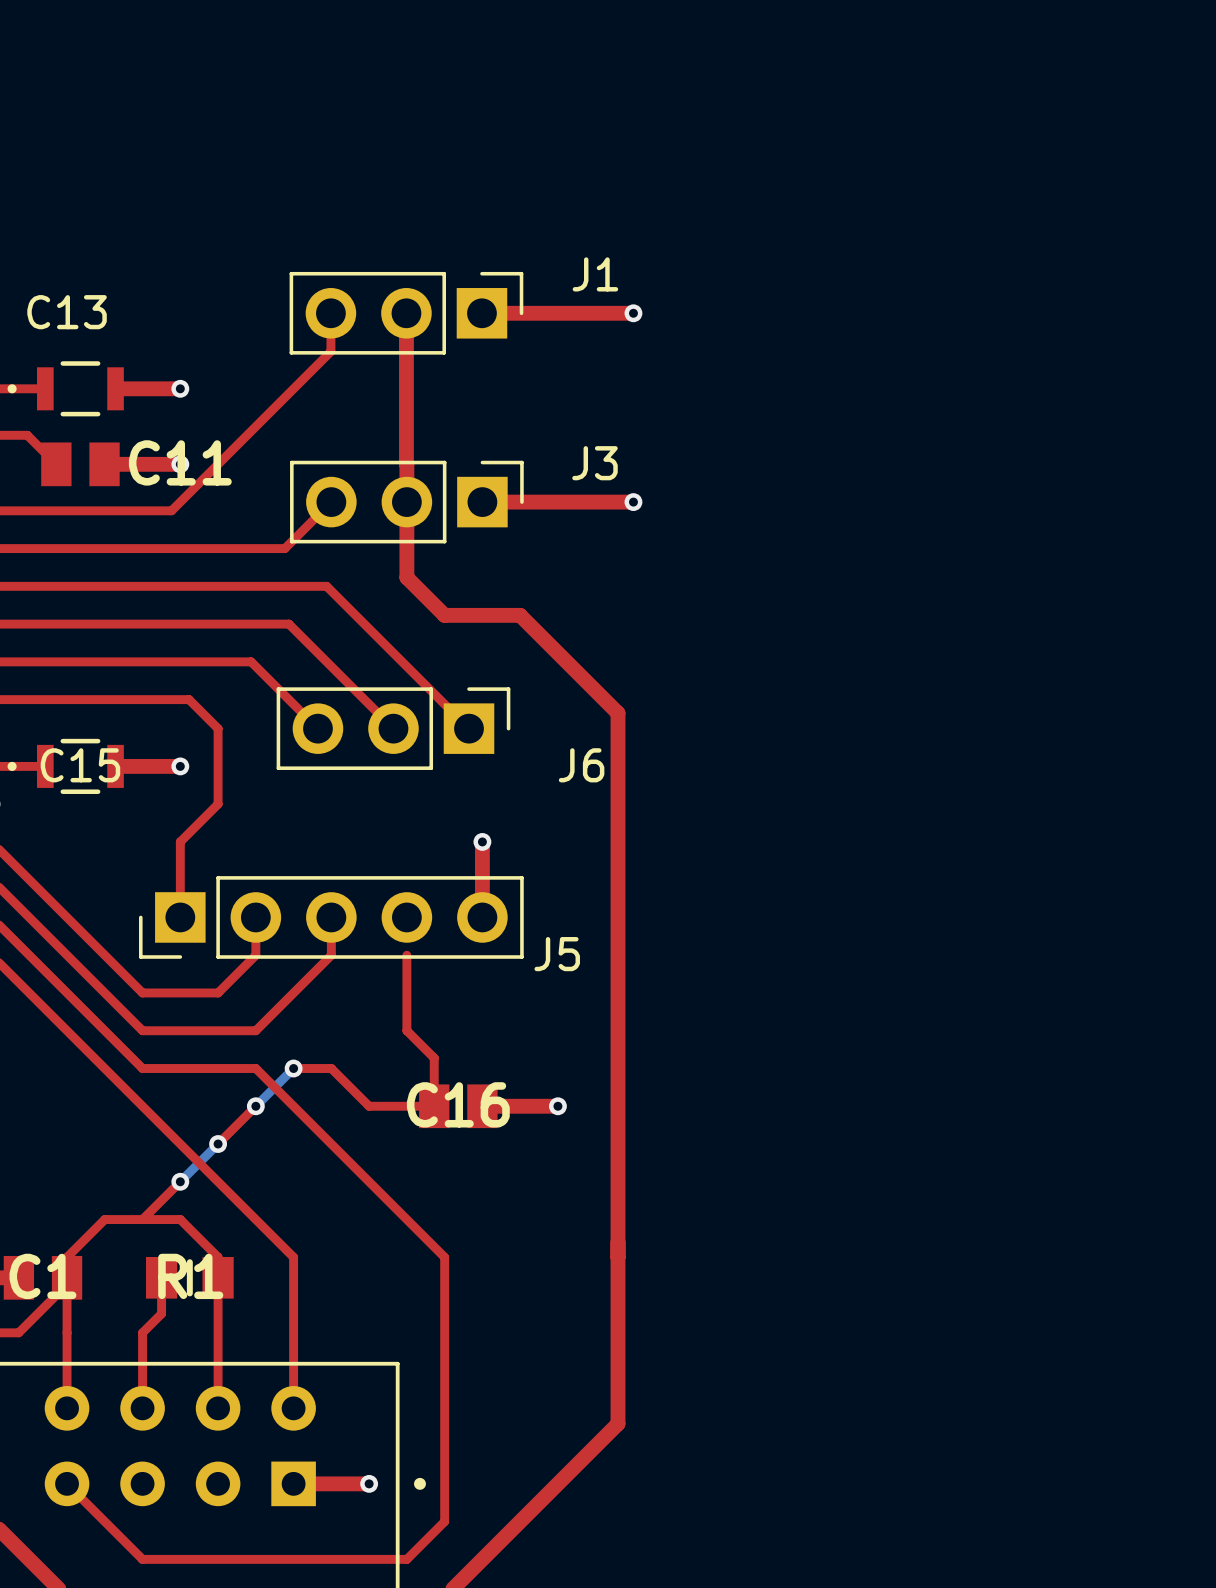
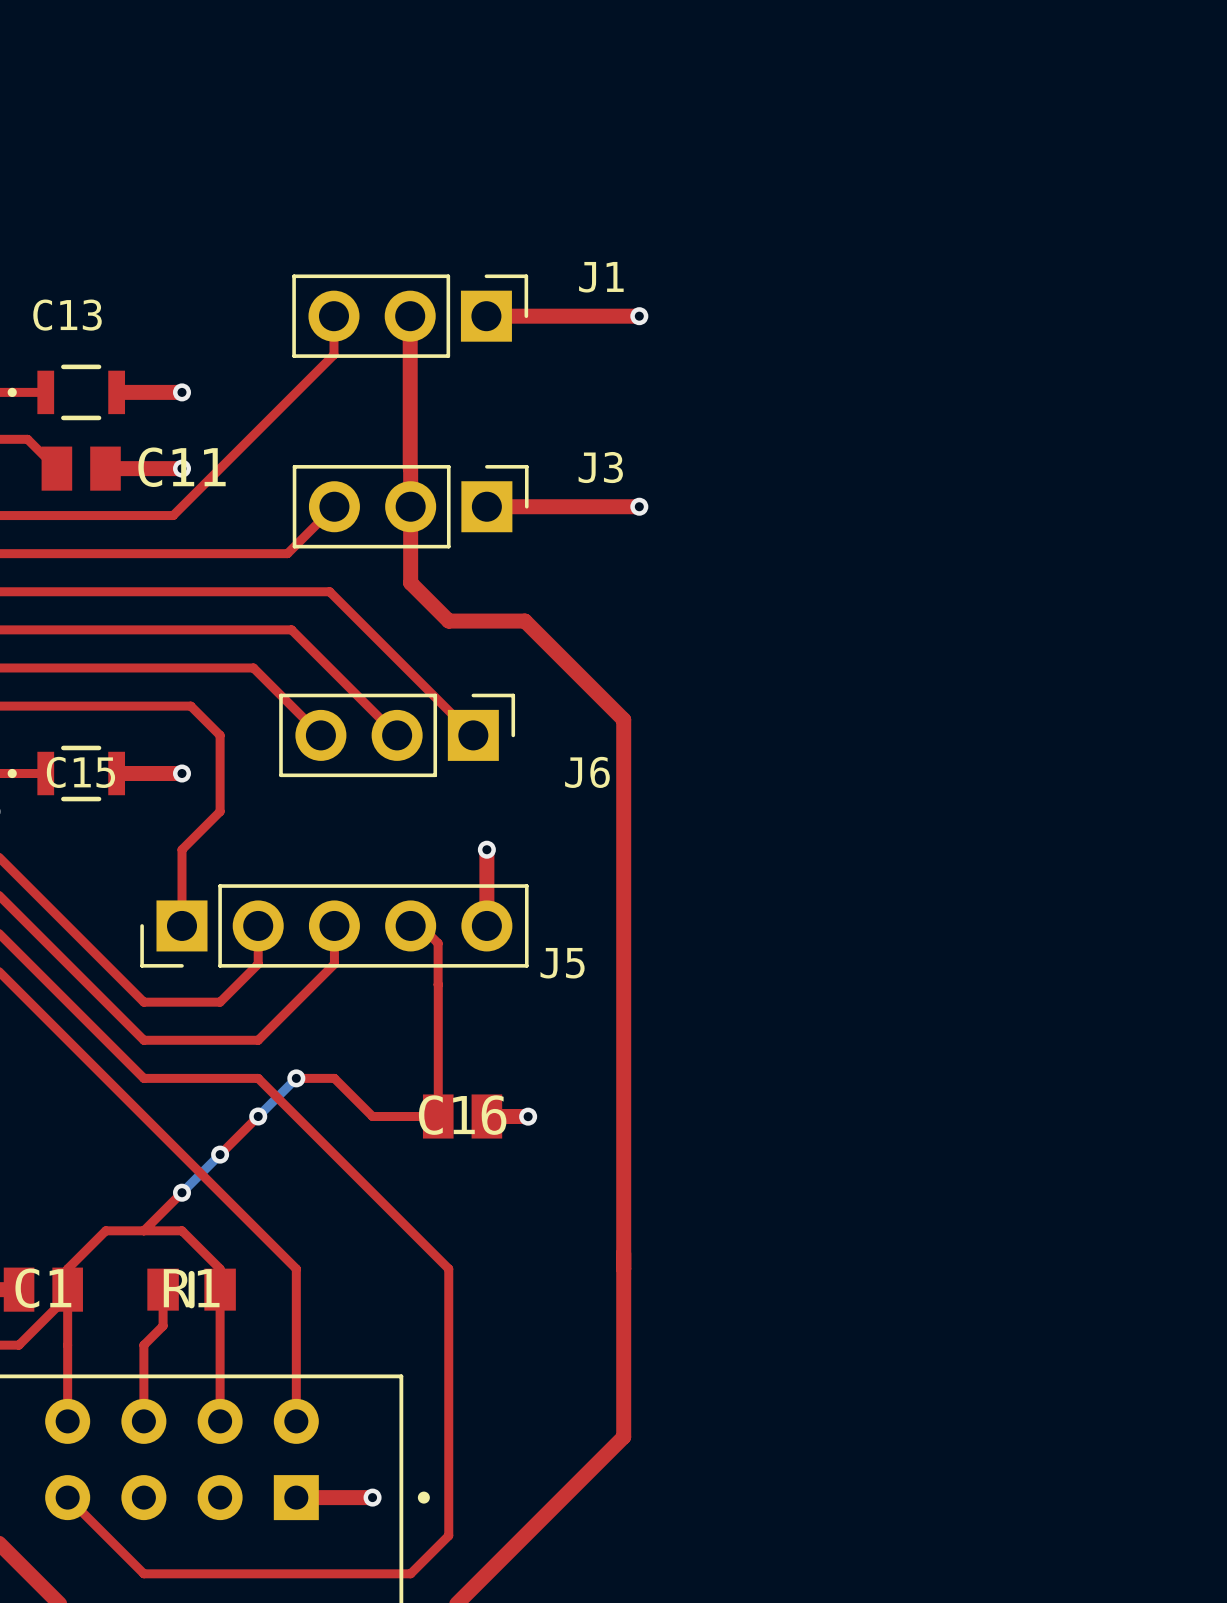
top track: none -> (410, 925) (420, 925) (438, 943) (438, 984)
top track: (406, 955) (406, 1030) (434, 1058) -> (438, 984) (438, 1067)
top track: (523, 1106) (557, 1106) -> none
via position: (557, 1106) -> (528, 1116)

